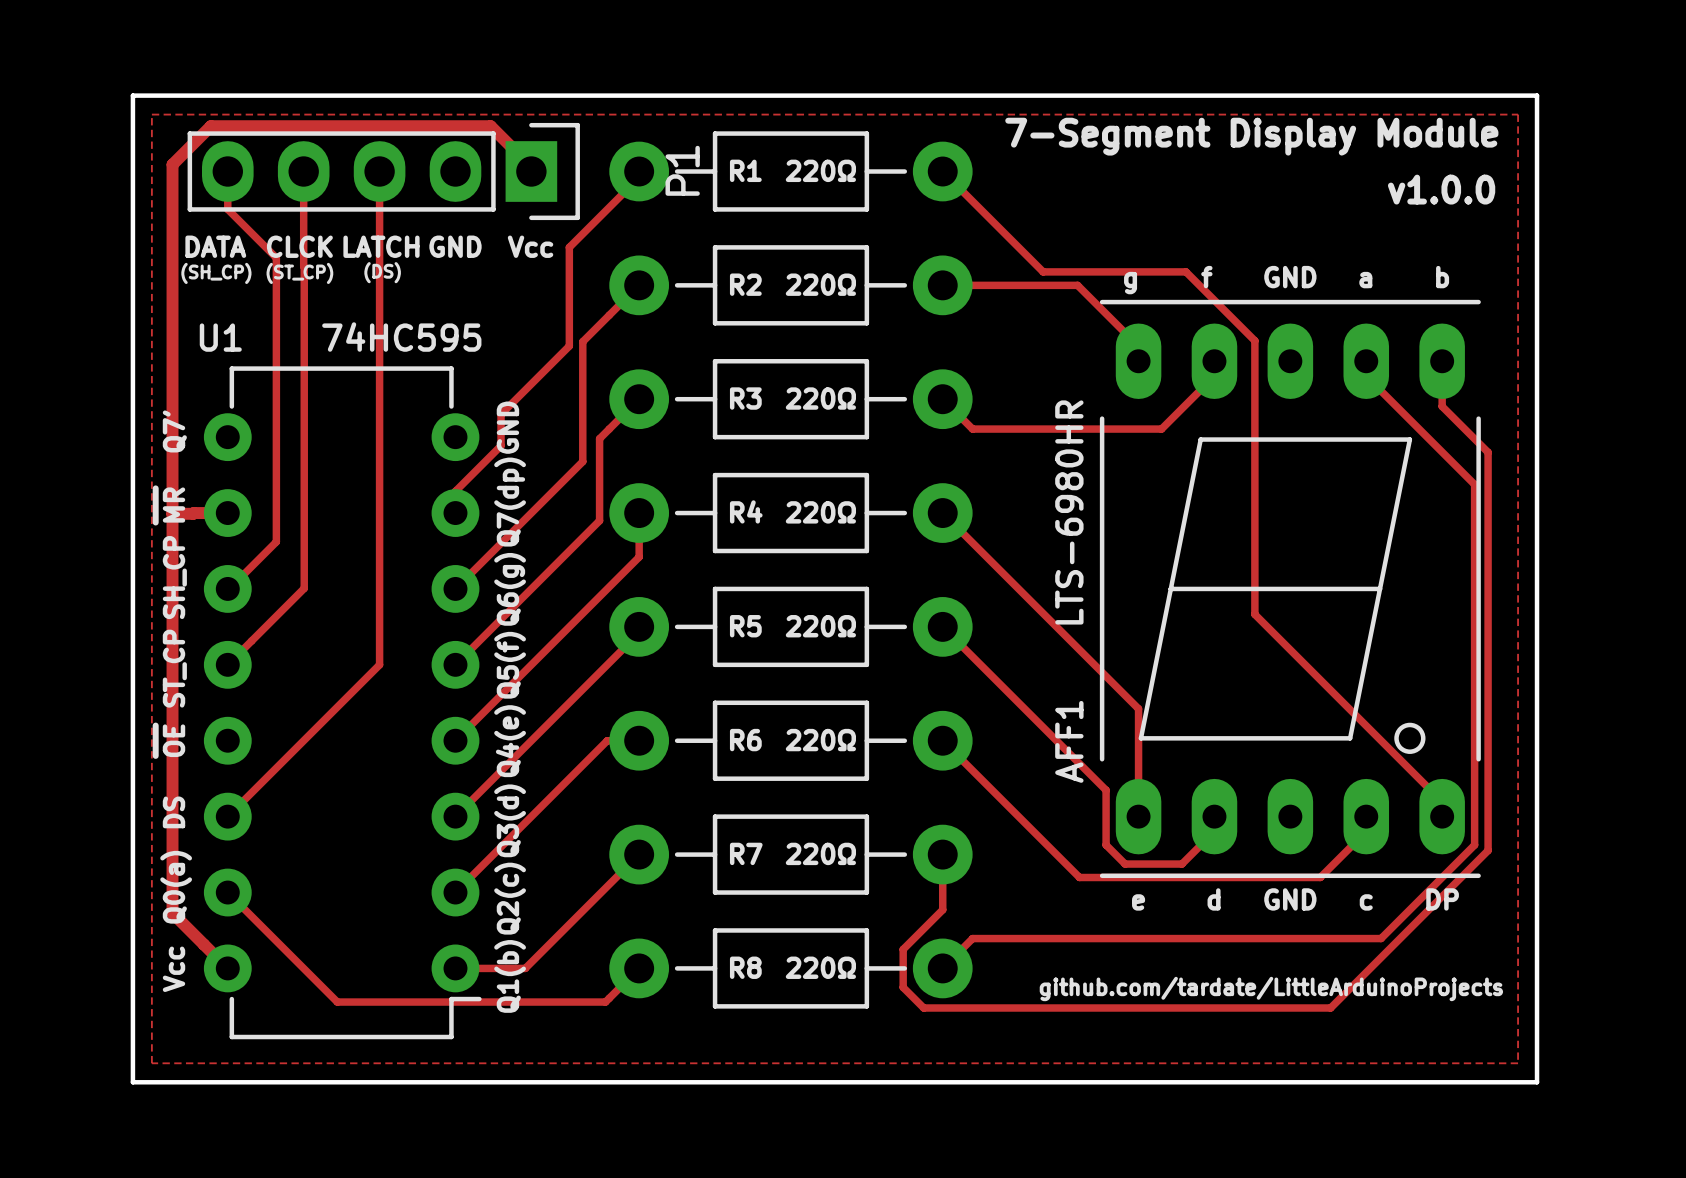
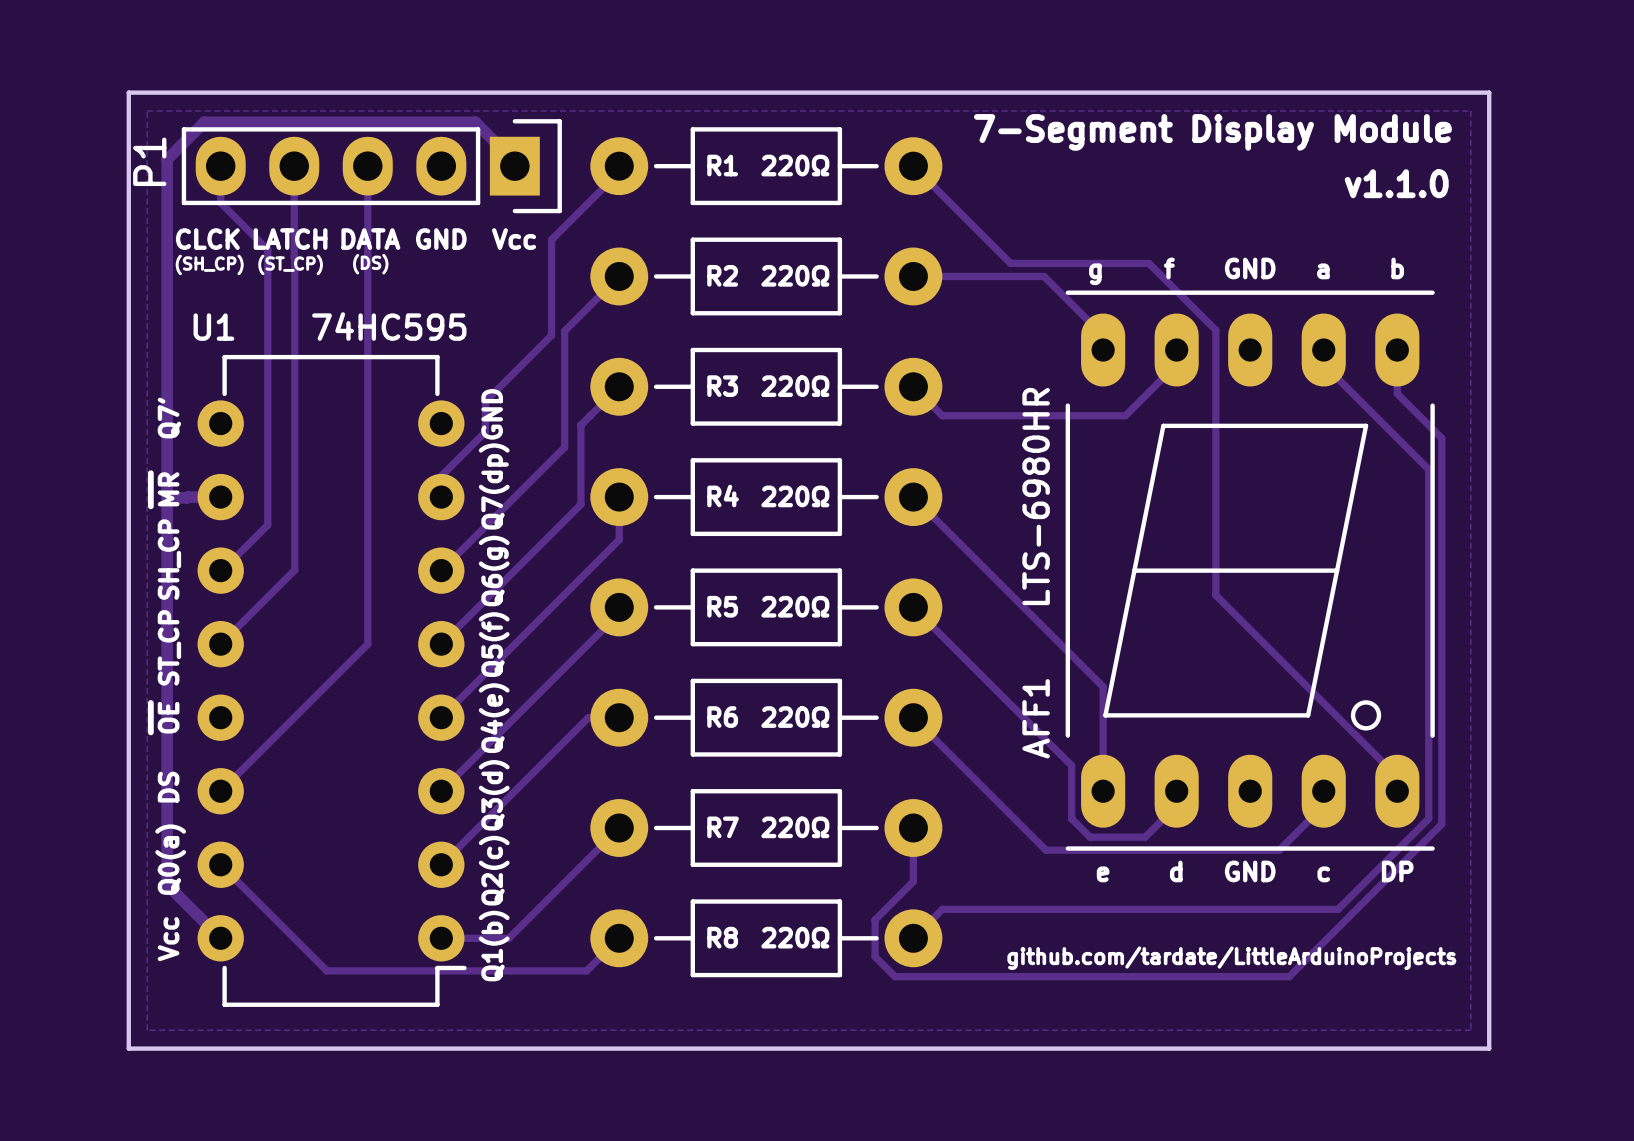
P1 name position: P1 (682, 170) -> P1 (149, 161)
text: v1.0.0 (1441, 189) -> v1.1.0 (1396, 183)
text: DATA (215, 246) -> CLCK (207, 239)
text: CLCK (299, 246) -> LATCH (290, 239)
text: LATCH (381, 246) -> DATA (370, 239)

